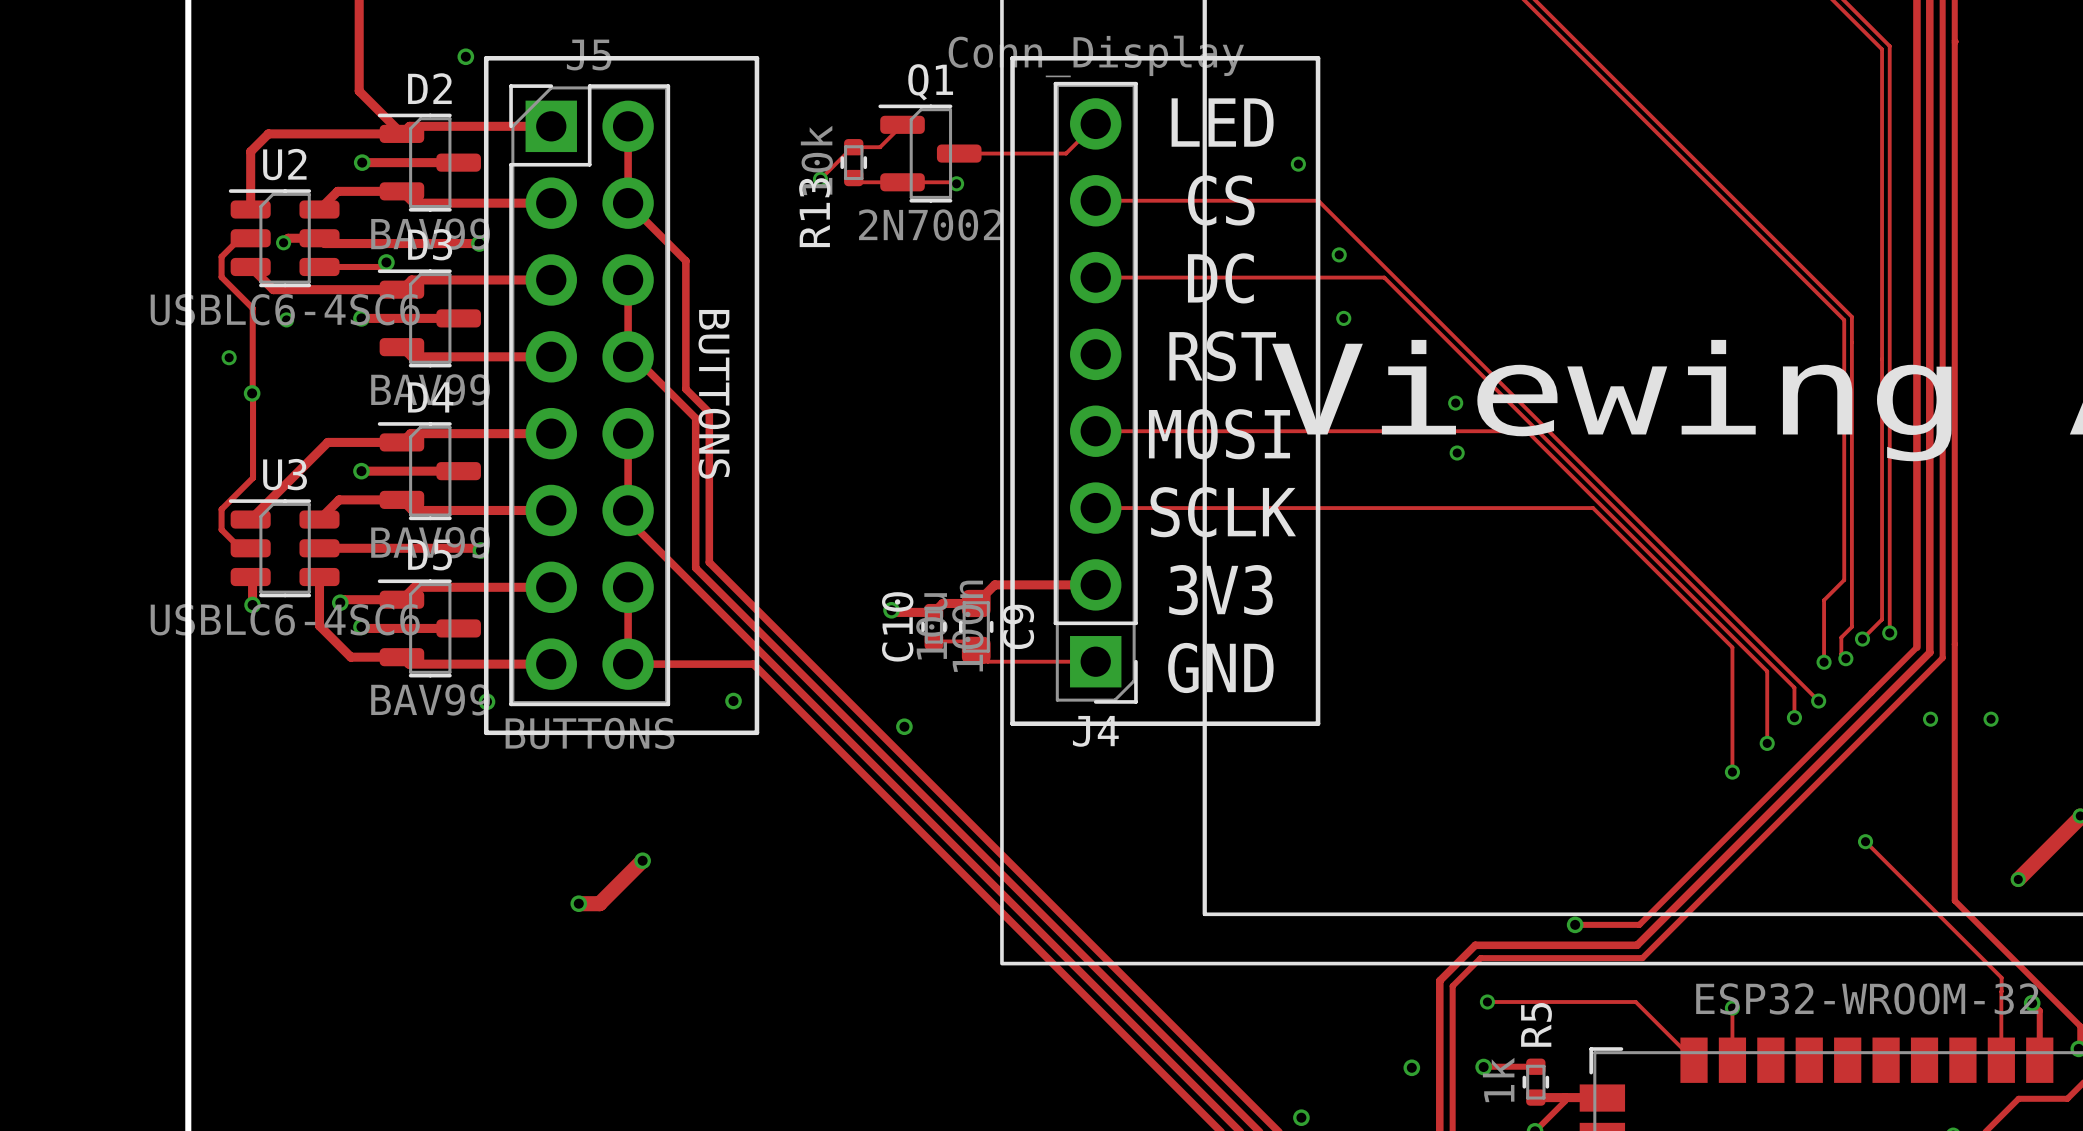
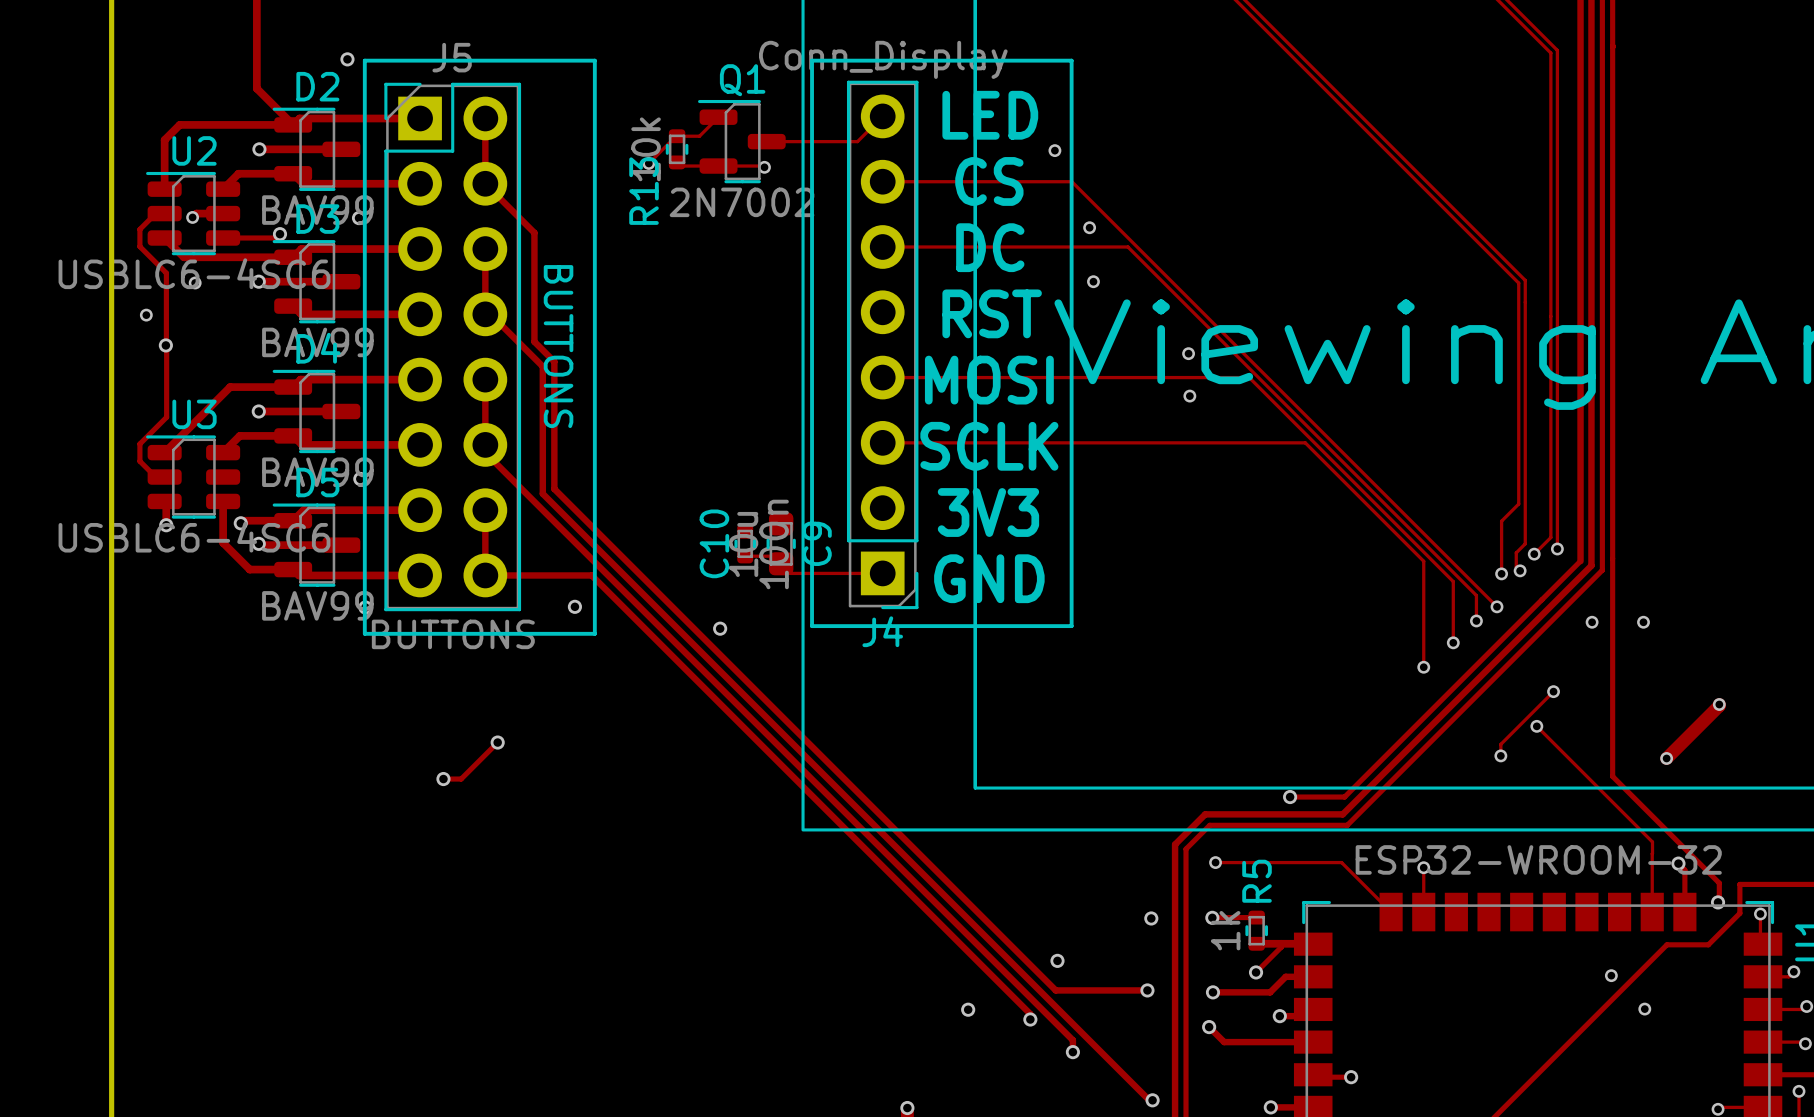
track: (319, 238) (324, 243) (479, 243) -> none
track: (319, 548) (478, 548) (480, 550) -> none
track: (1095, 584) (994, 584) (976, 603) (942, 603) (933, 612) (893, 612) (891, 610) -> none
via: (891, 610) -> none
track: none -> (1553, 691) (1500, 744) (1500, 755)
via: none -> (1553, 691)
track width: thick (642, 860) (599, 903) (578, 903) -> thin (497, 742) (461, 779) (443, 779)
via: none -> (1500, 755)

